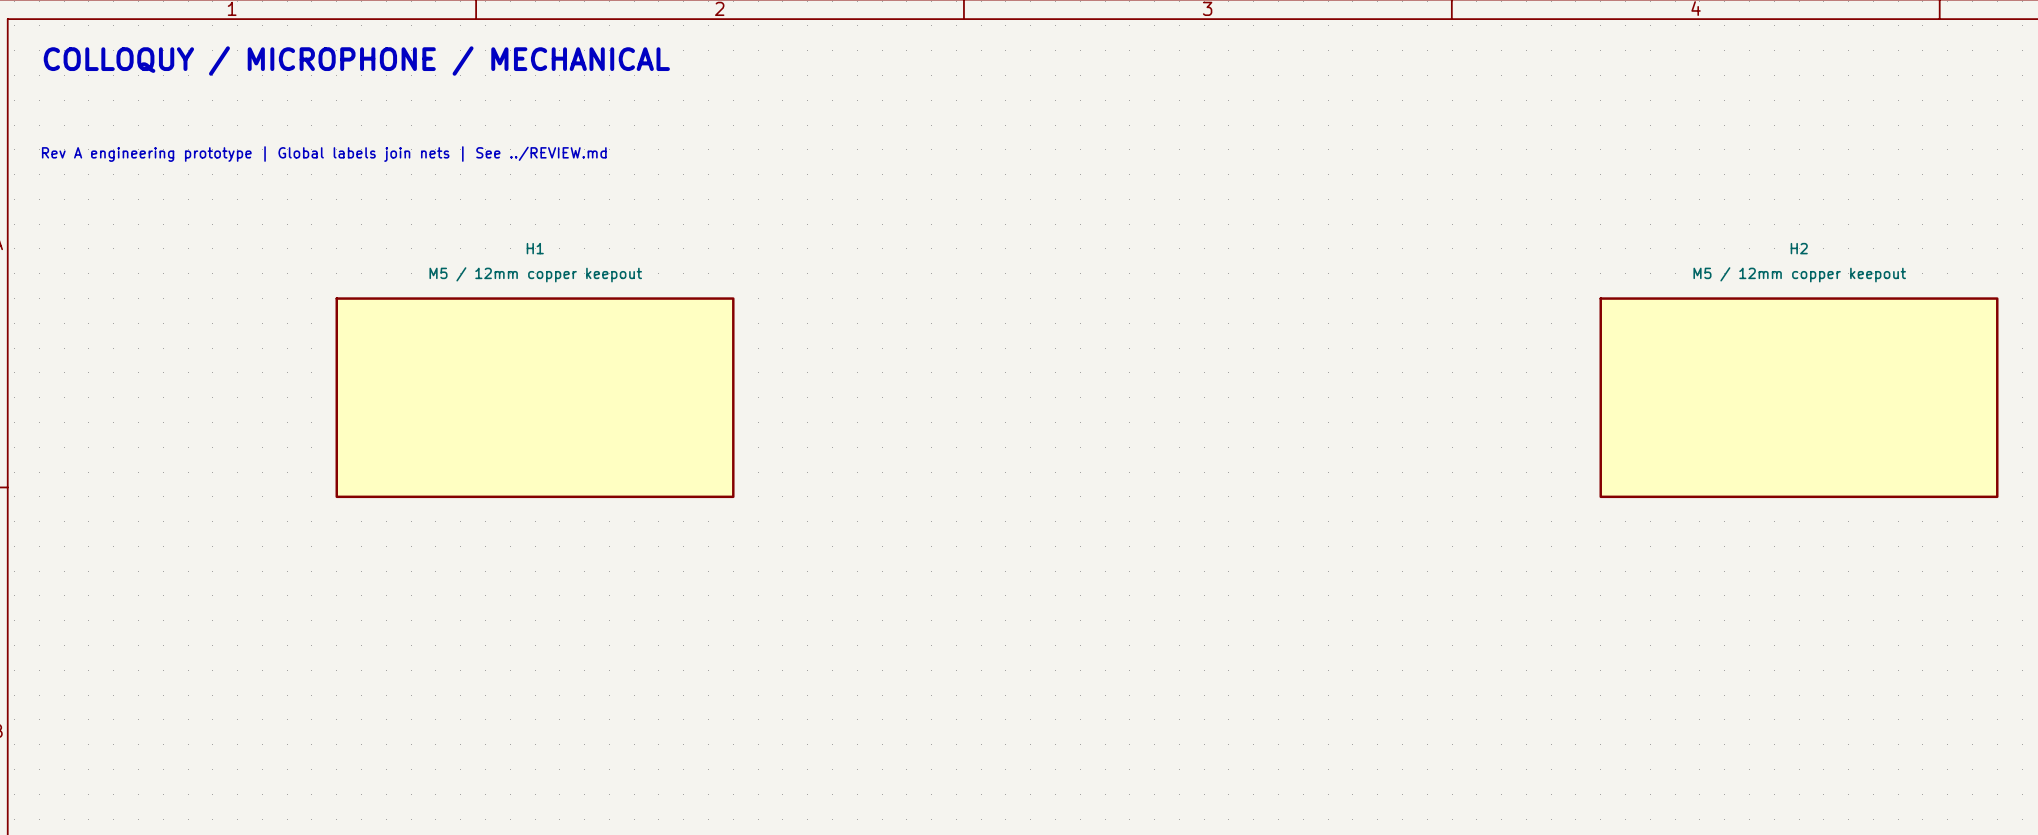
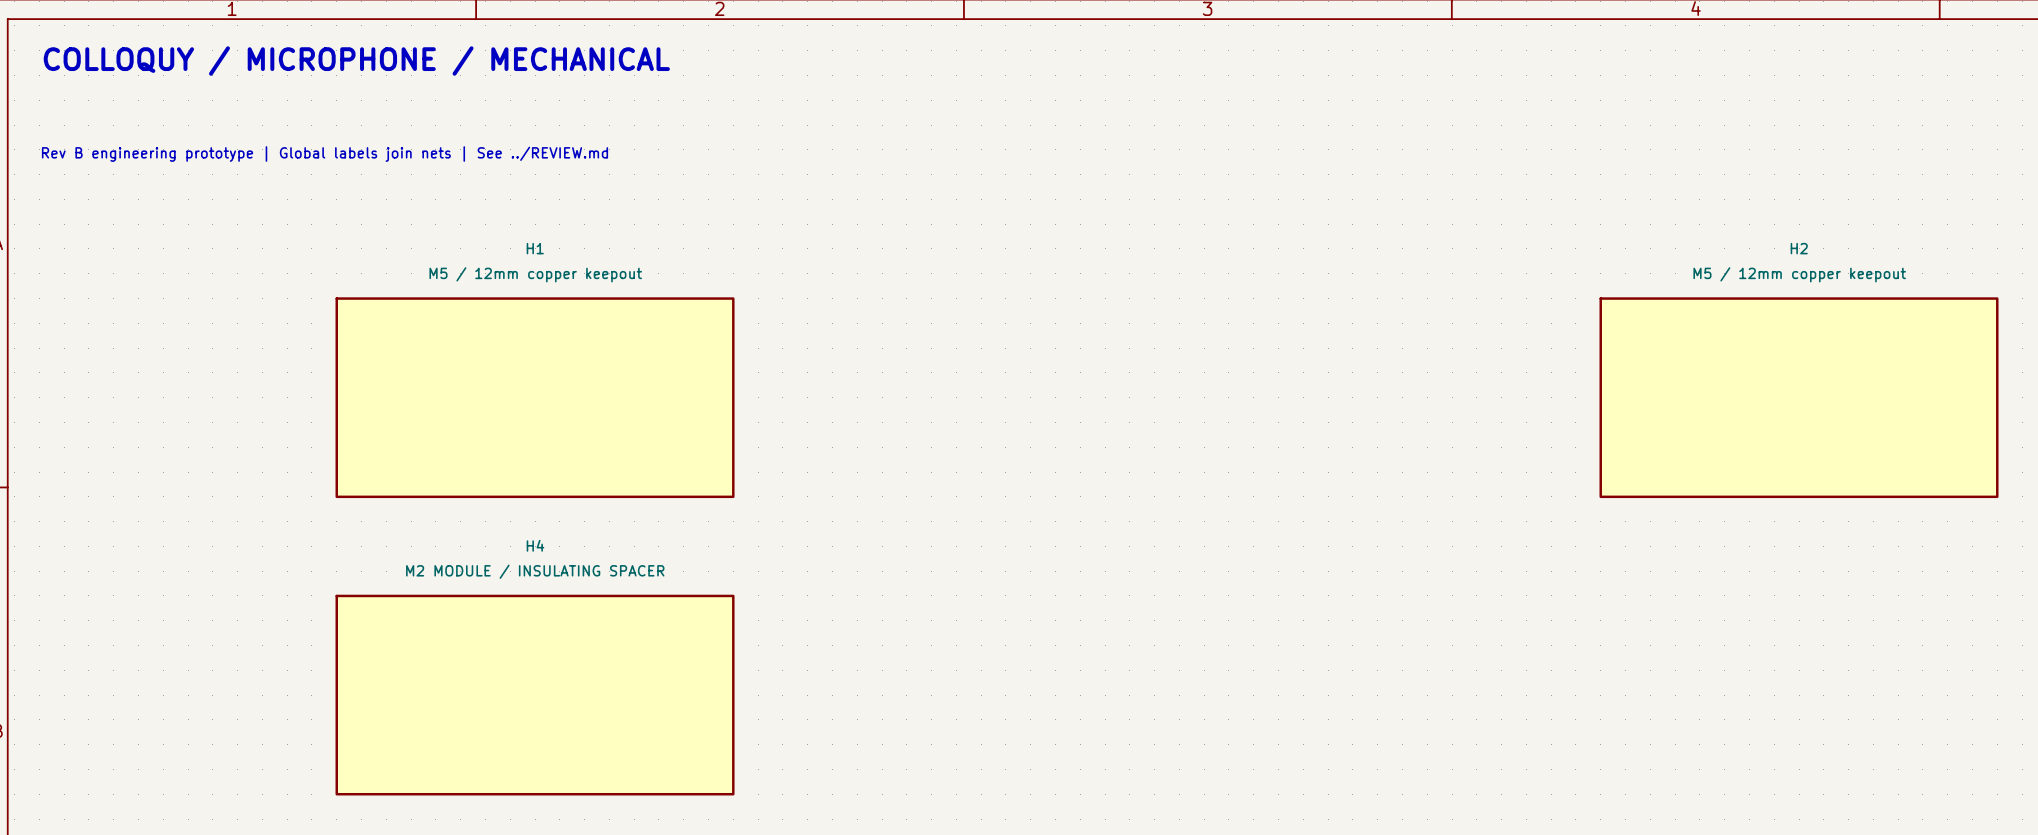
text: Rev A engineering prototype | Global labels join nets | See ../REVIEW.md (324, 154) -> Rev B engineering prototype | Global labels join nets | See ../REVIEW.md (324, 154)
H4: none -> M2 MODULE / INSULATING SPACER (535, 695)

